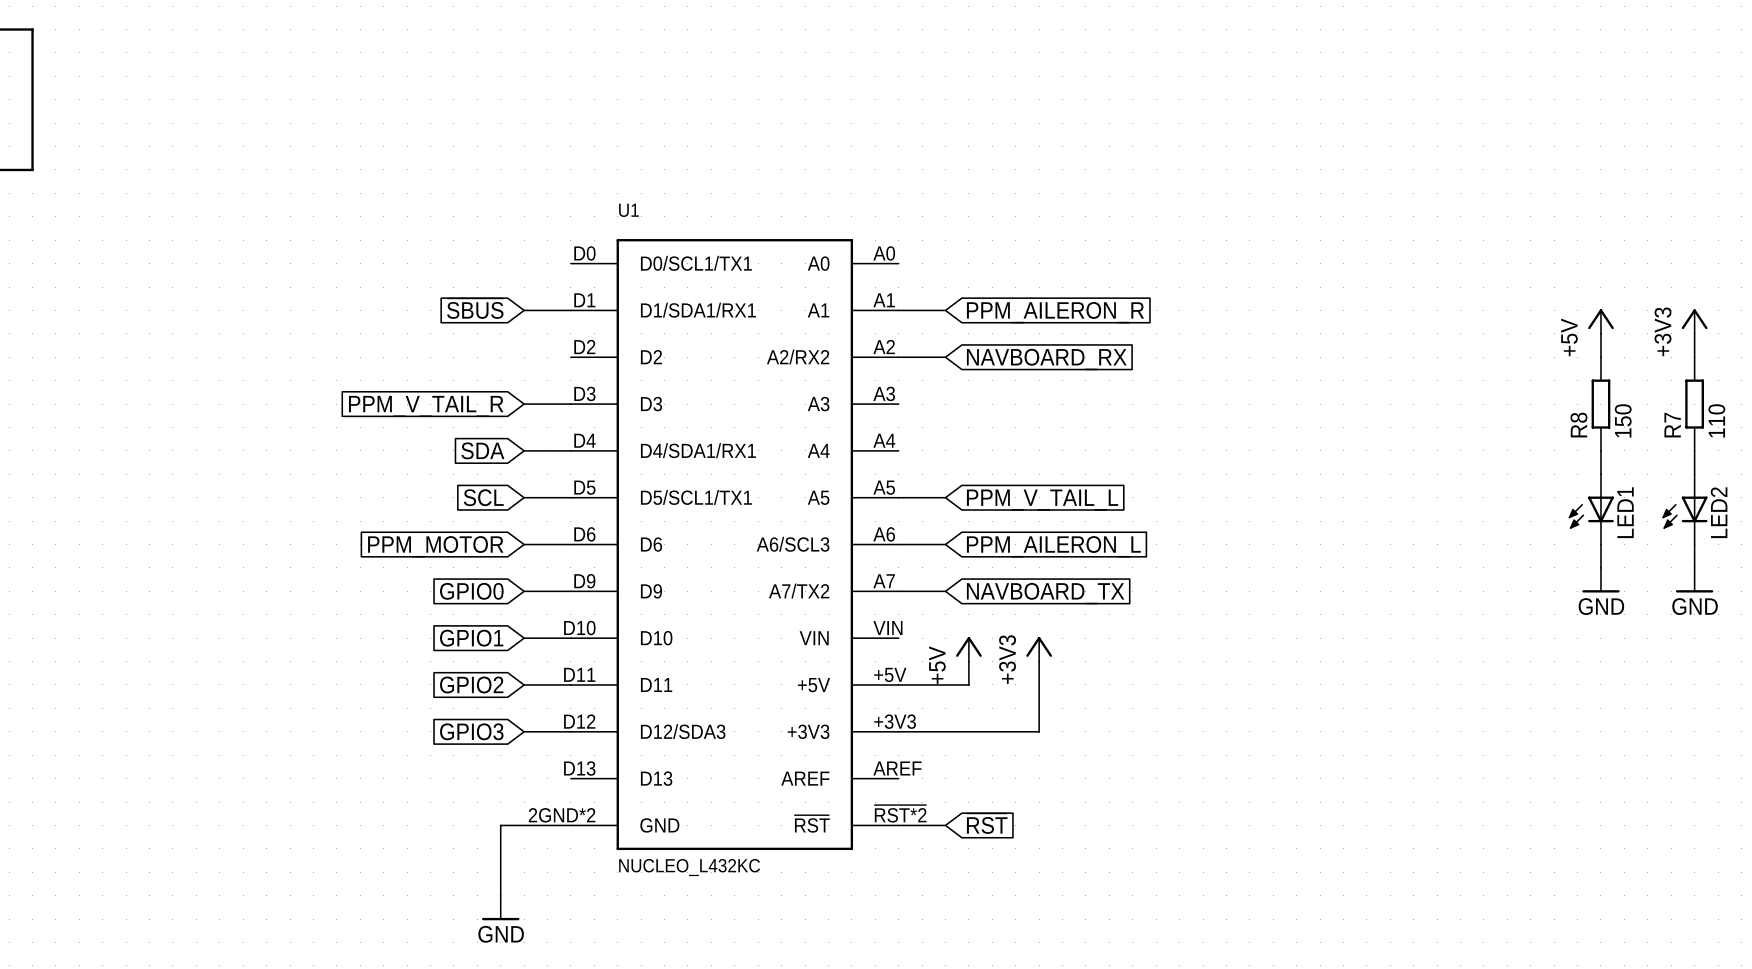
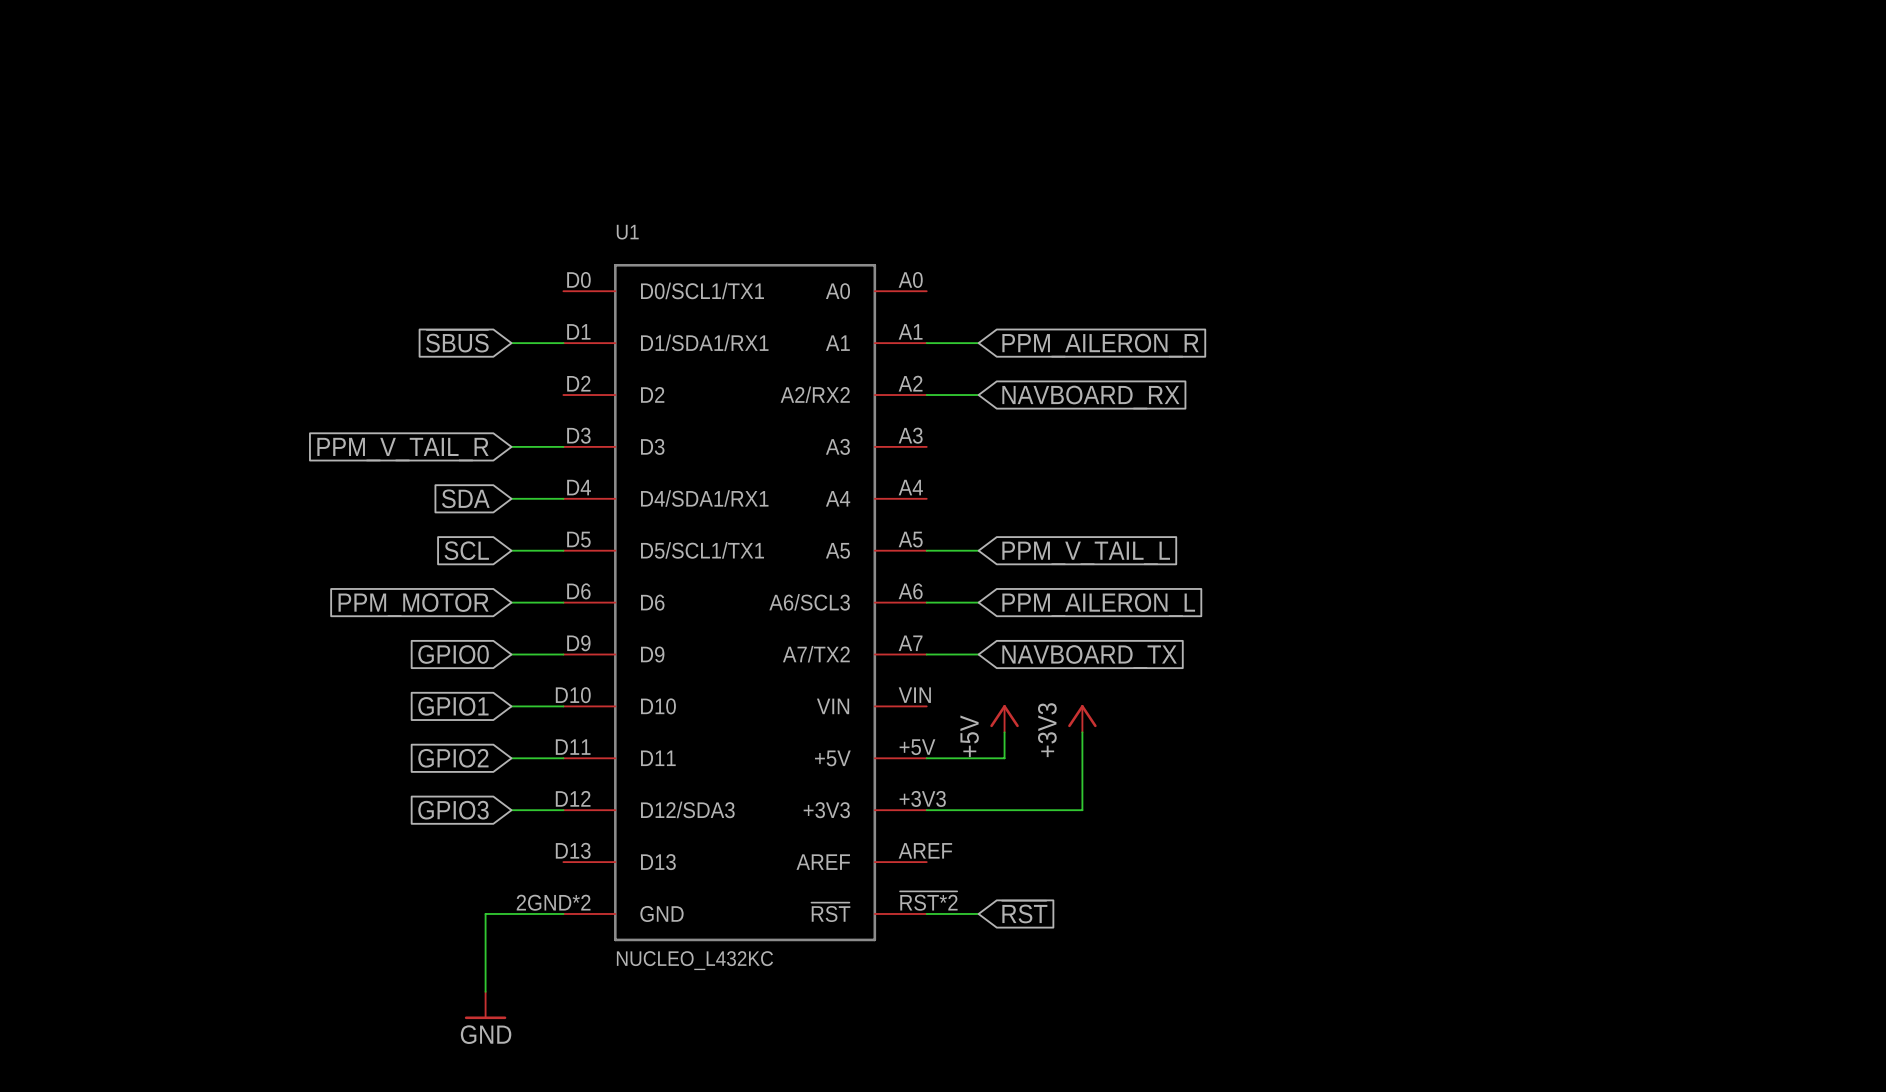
power symbol: +5V (1600, 321) -> none
power symbol: +3V3 (1694, 321) -> none
wire: (1600, 333) (1600, 357) -> none
wire: (1694, 333) (1694, 357) -> none
R8: 150 (1600, 404) -> none
R7: 110 (1694, 404) -> none
wire: (1600, 450) (1600, 474) -> none
wire: (1694, 450) (1694, 474) -> none
LED1: (1591, 509) -> none
LED2: (1684, 509) -> none
wire: (1600, 544) (1600, 567) -> none
wire: (1694, 544) (1694, 567) -> none
power symbol: GND (1600, 580) -> none
power symbol: GND (1694, 580) -> none

